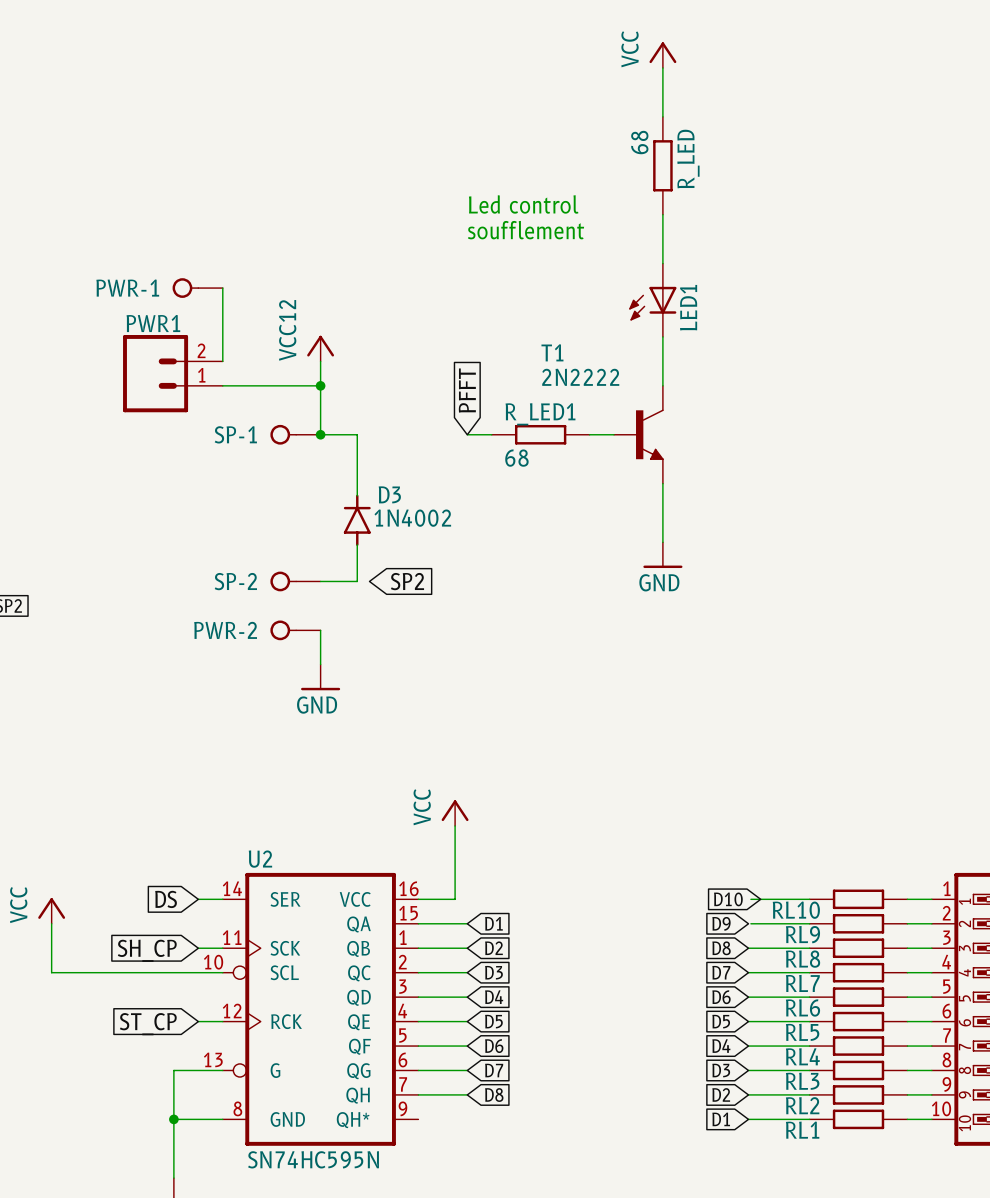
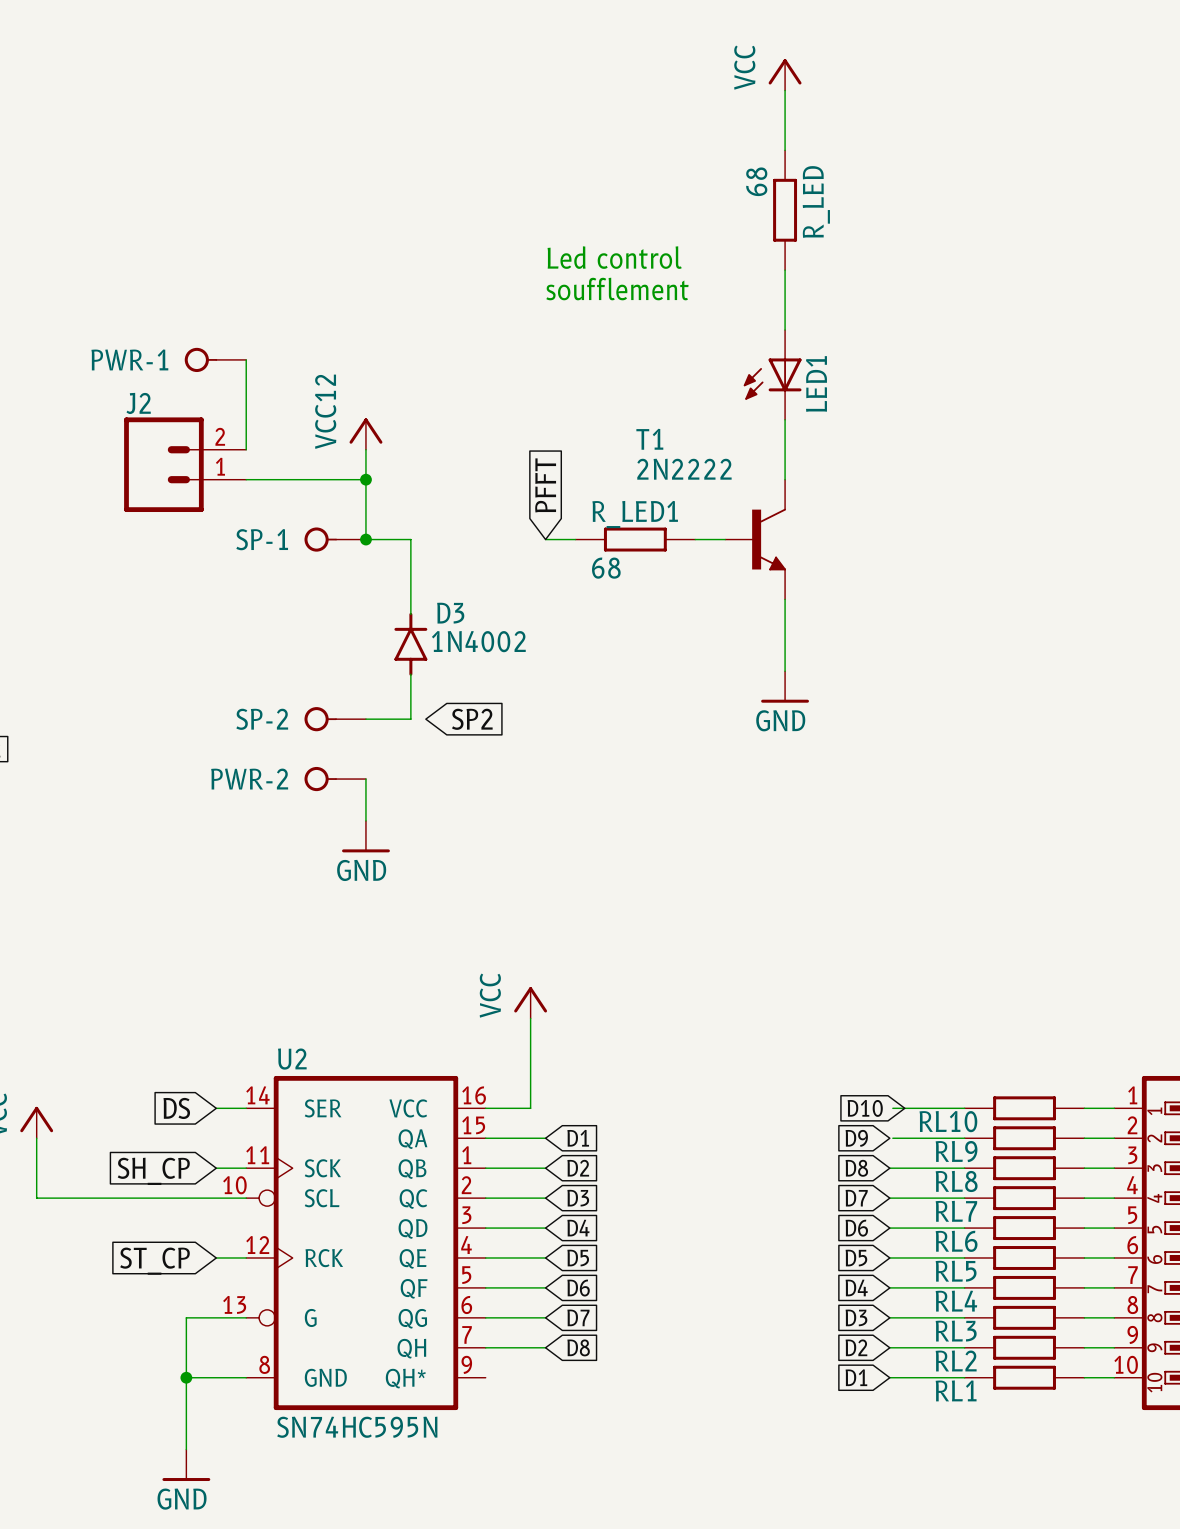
PWR1 name: PWR1 (153, 323) -> J2 (138, 403)

